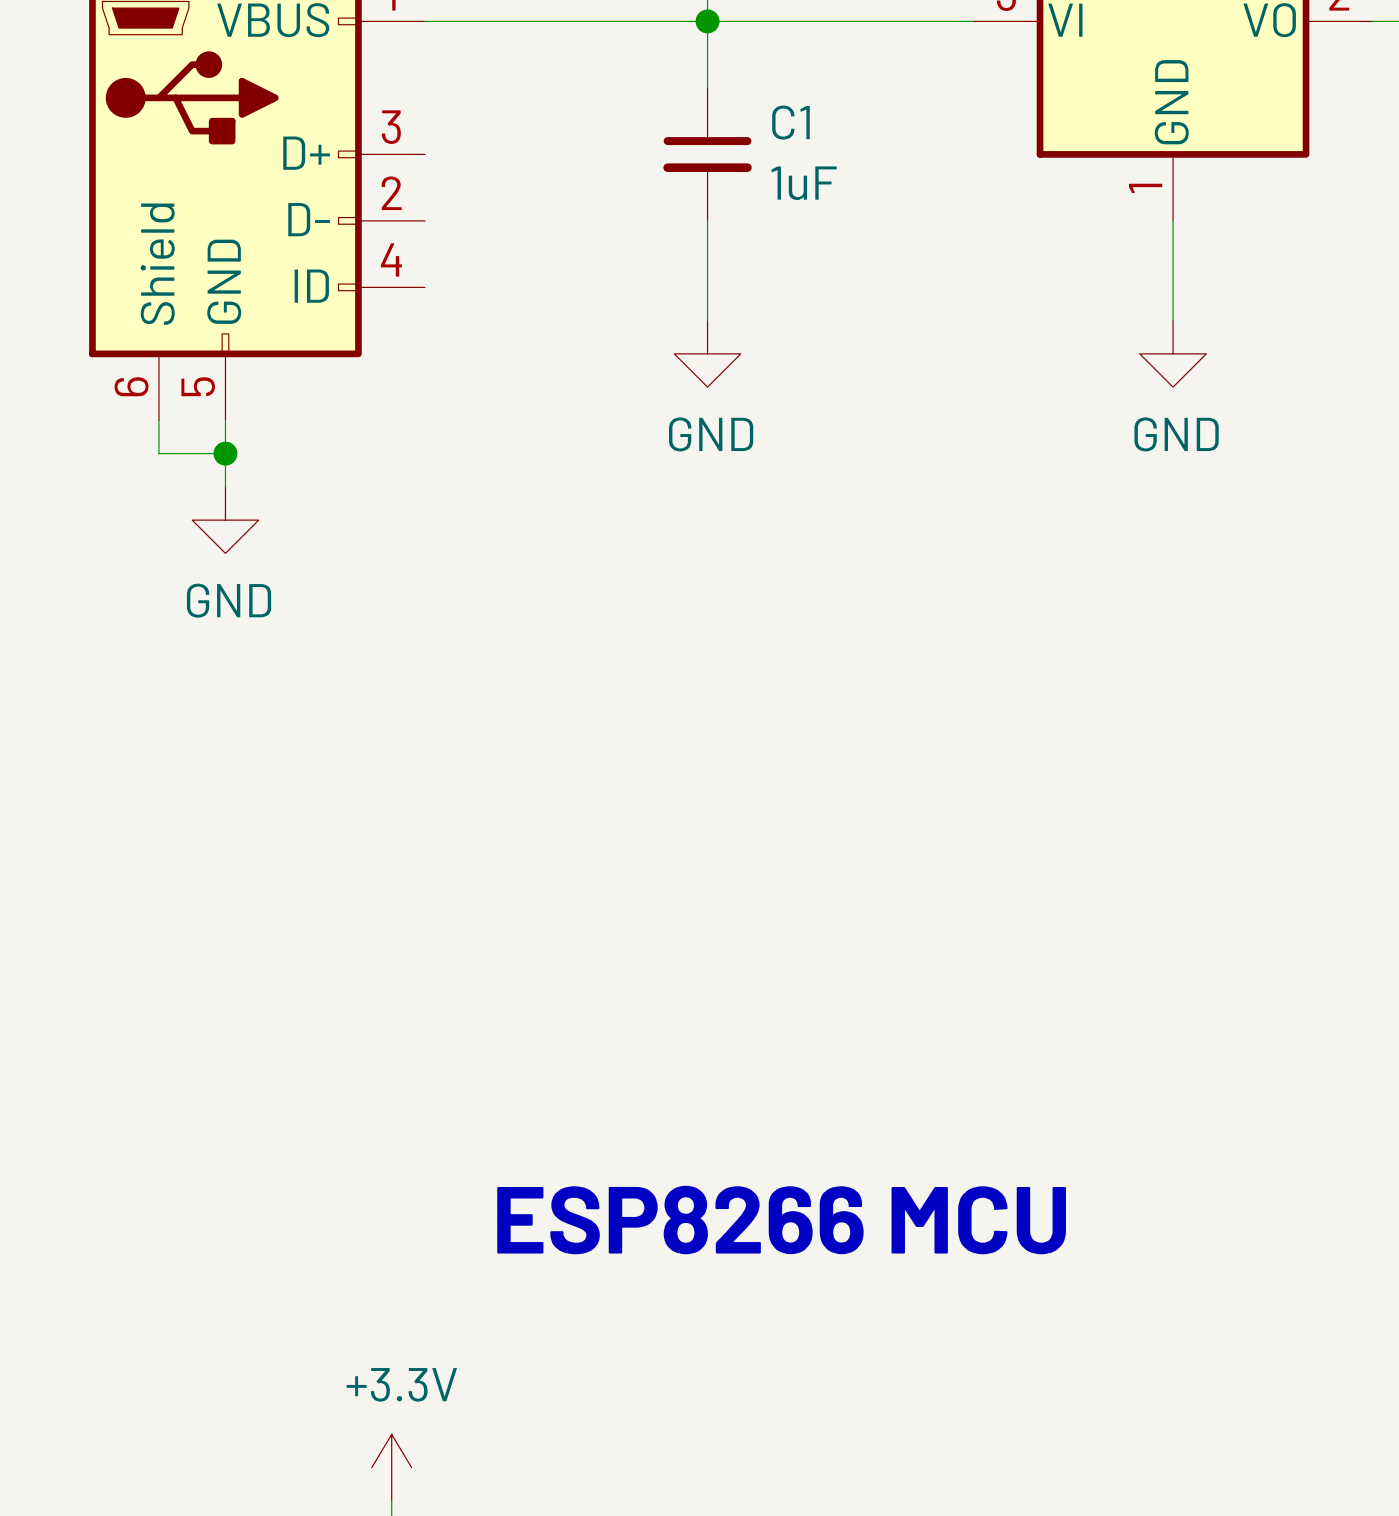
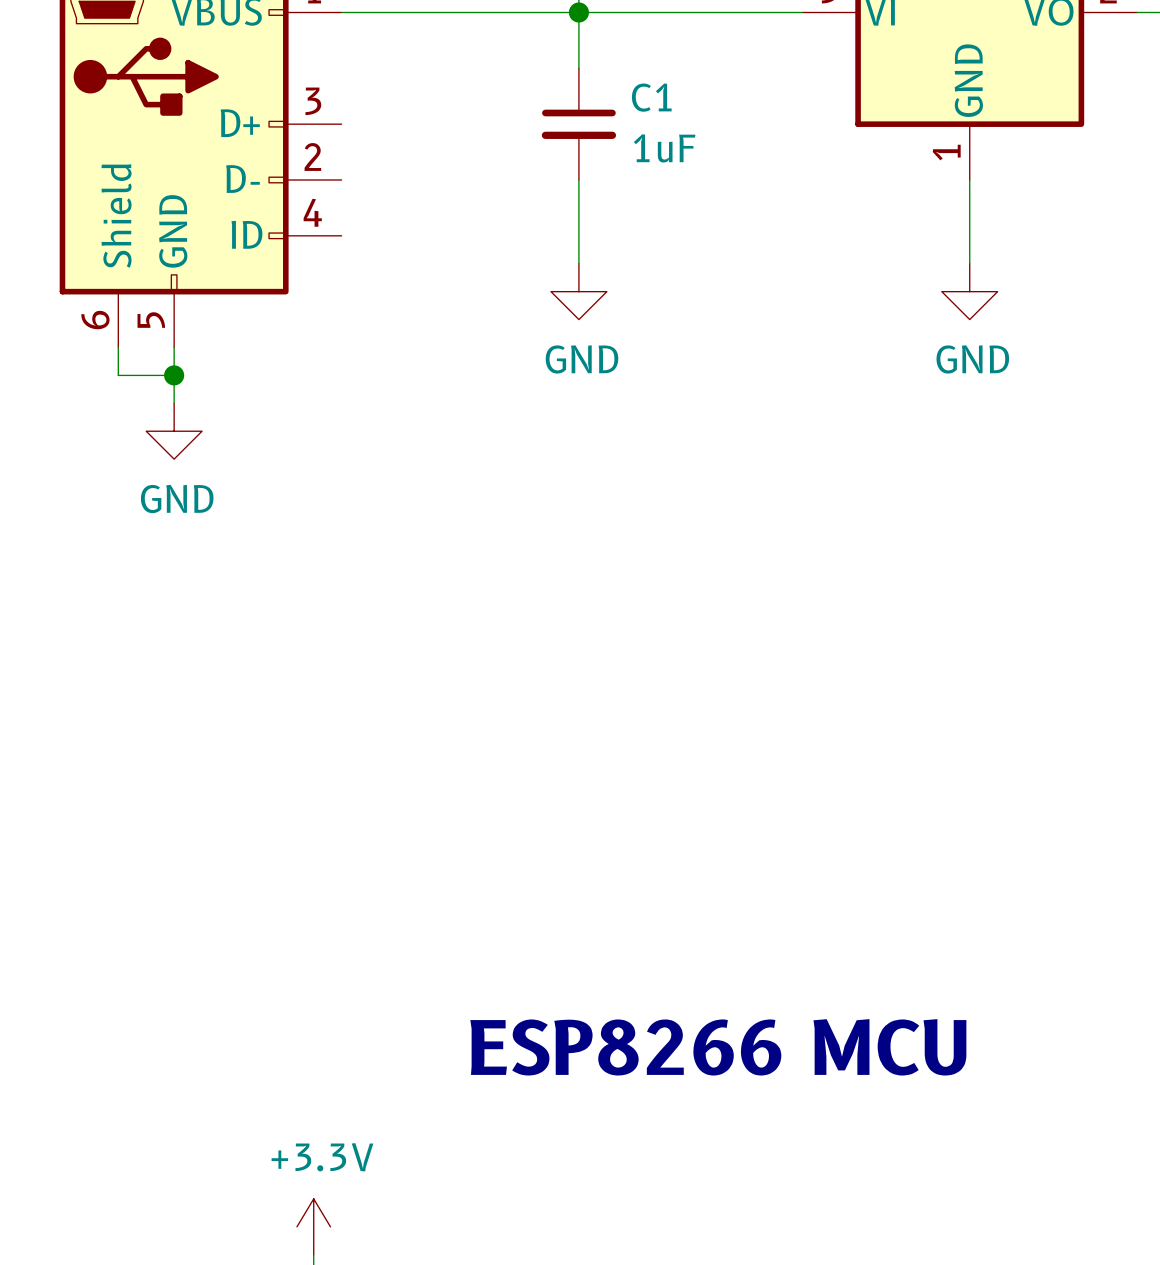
text position: ESP8266 MCU (781, 1220) -> ESP8266 MCU (718, 1047)

